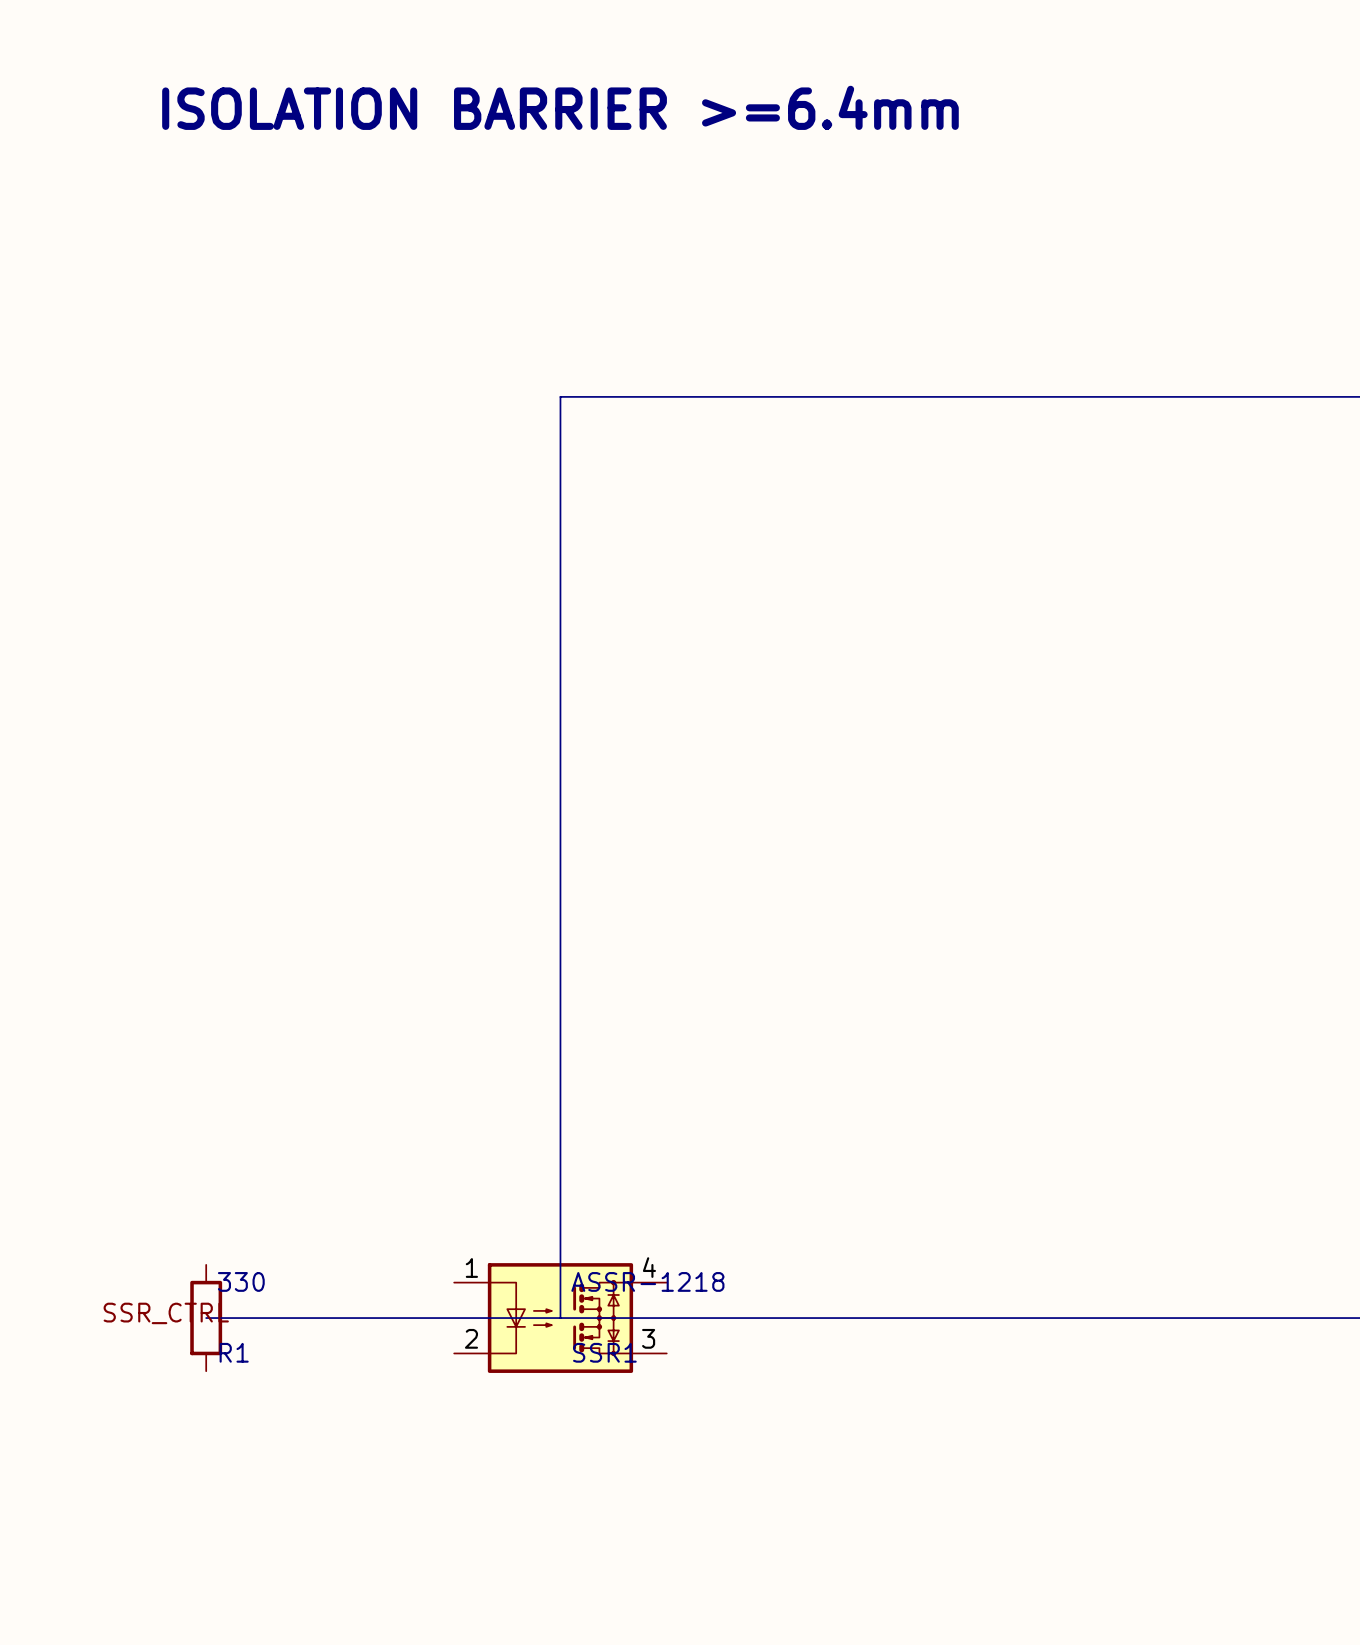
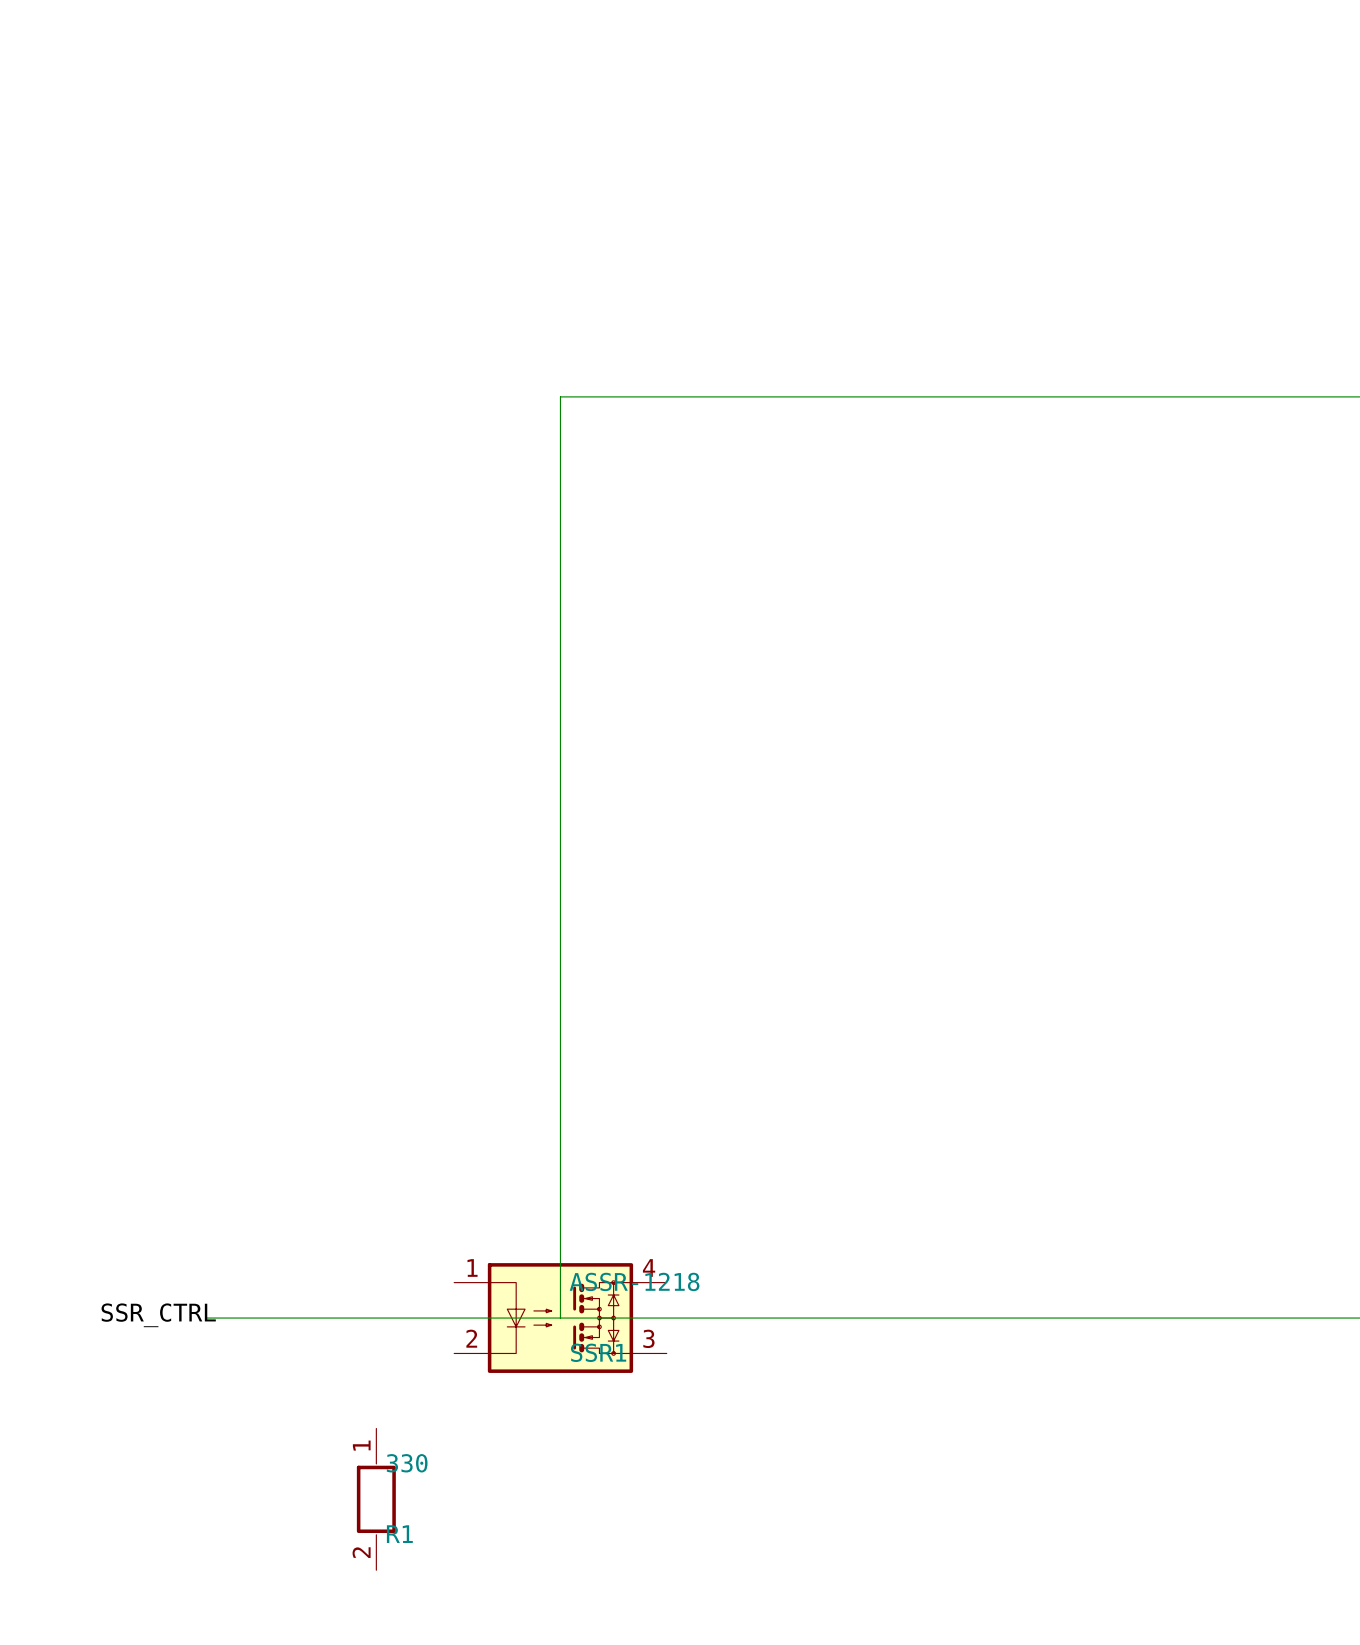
text: ISOLATION BARRIER >=6.4mm (560, 107) -> none
R1 symbol: [190, 1264, 223, 1372] -> [356, 1428, 396, 1571]

